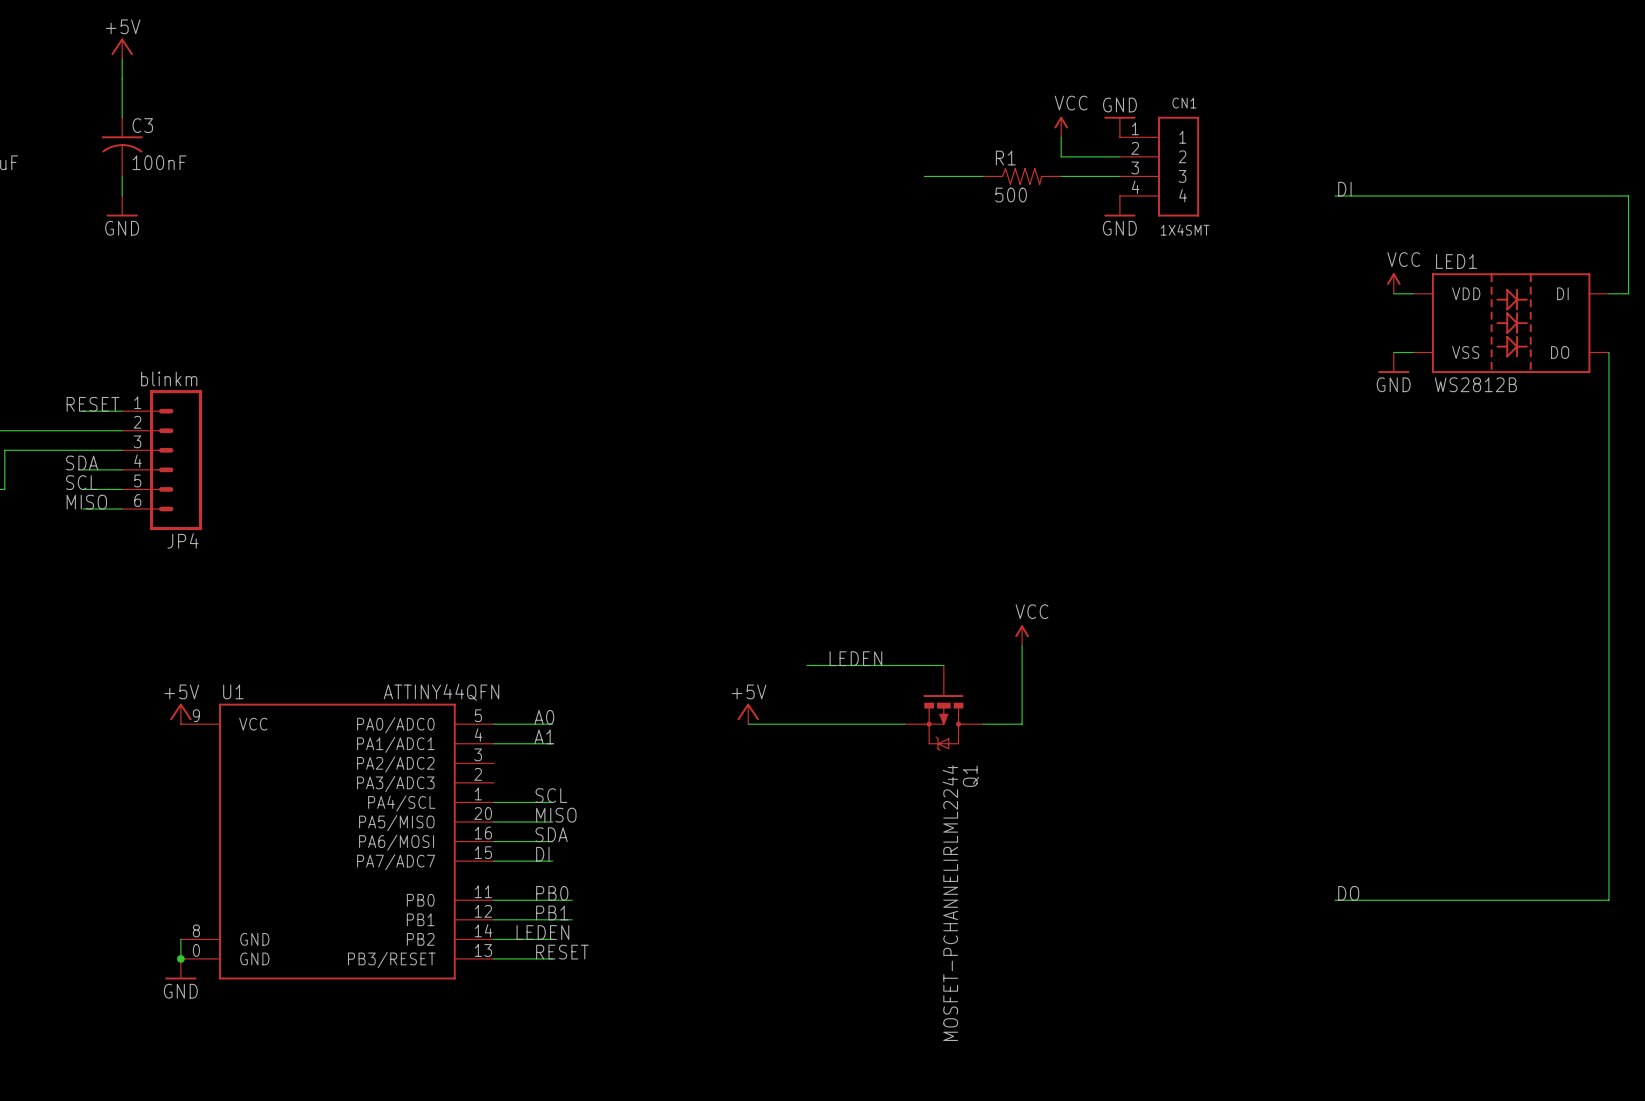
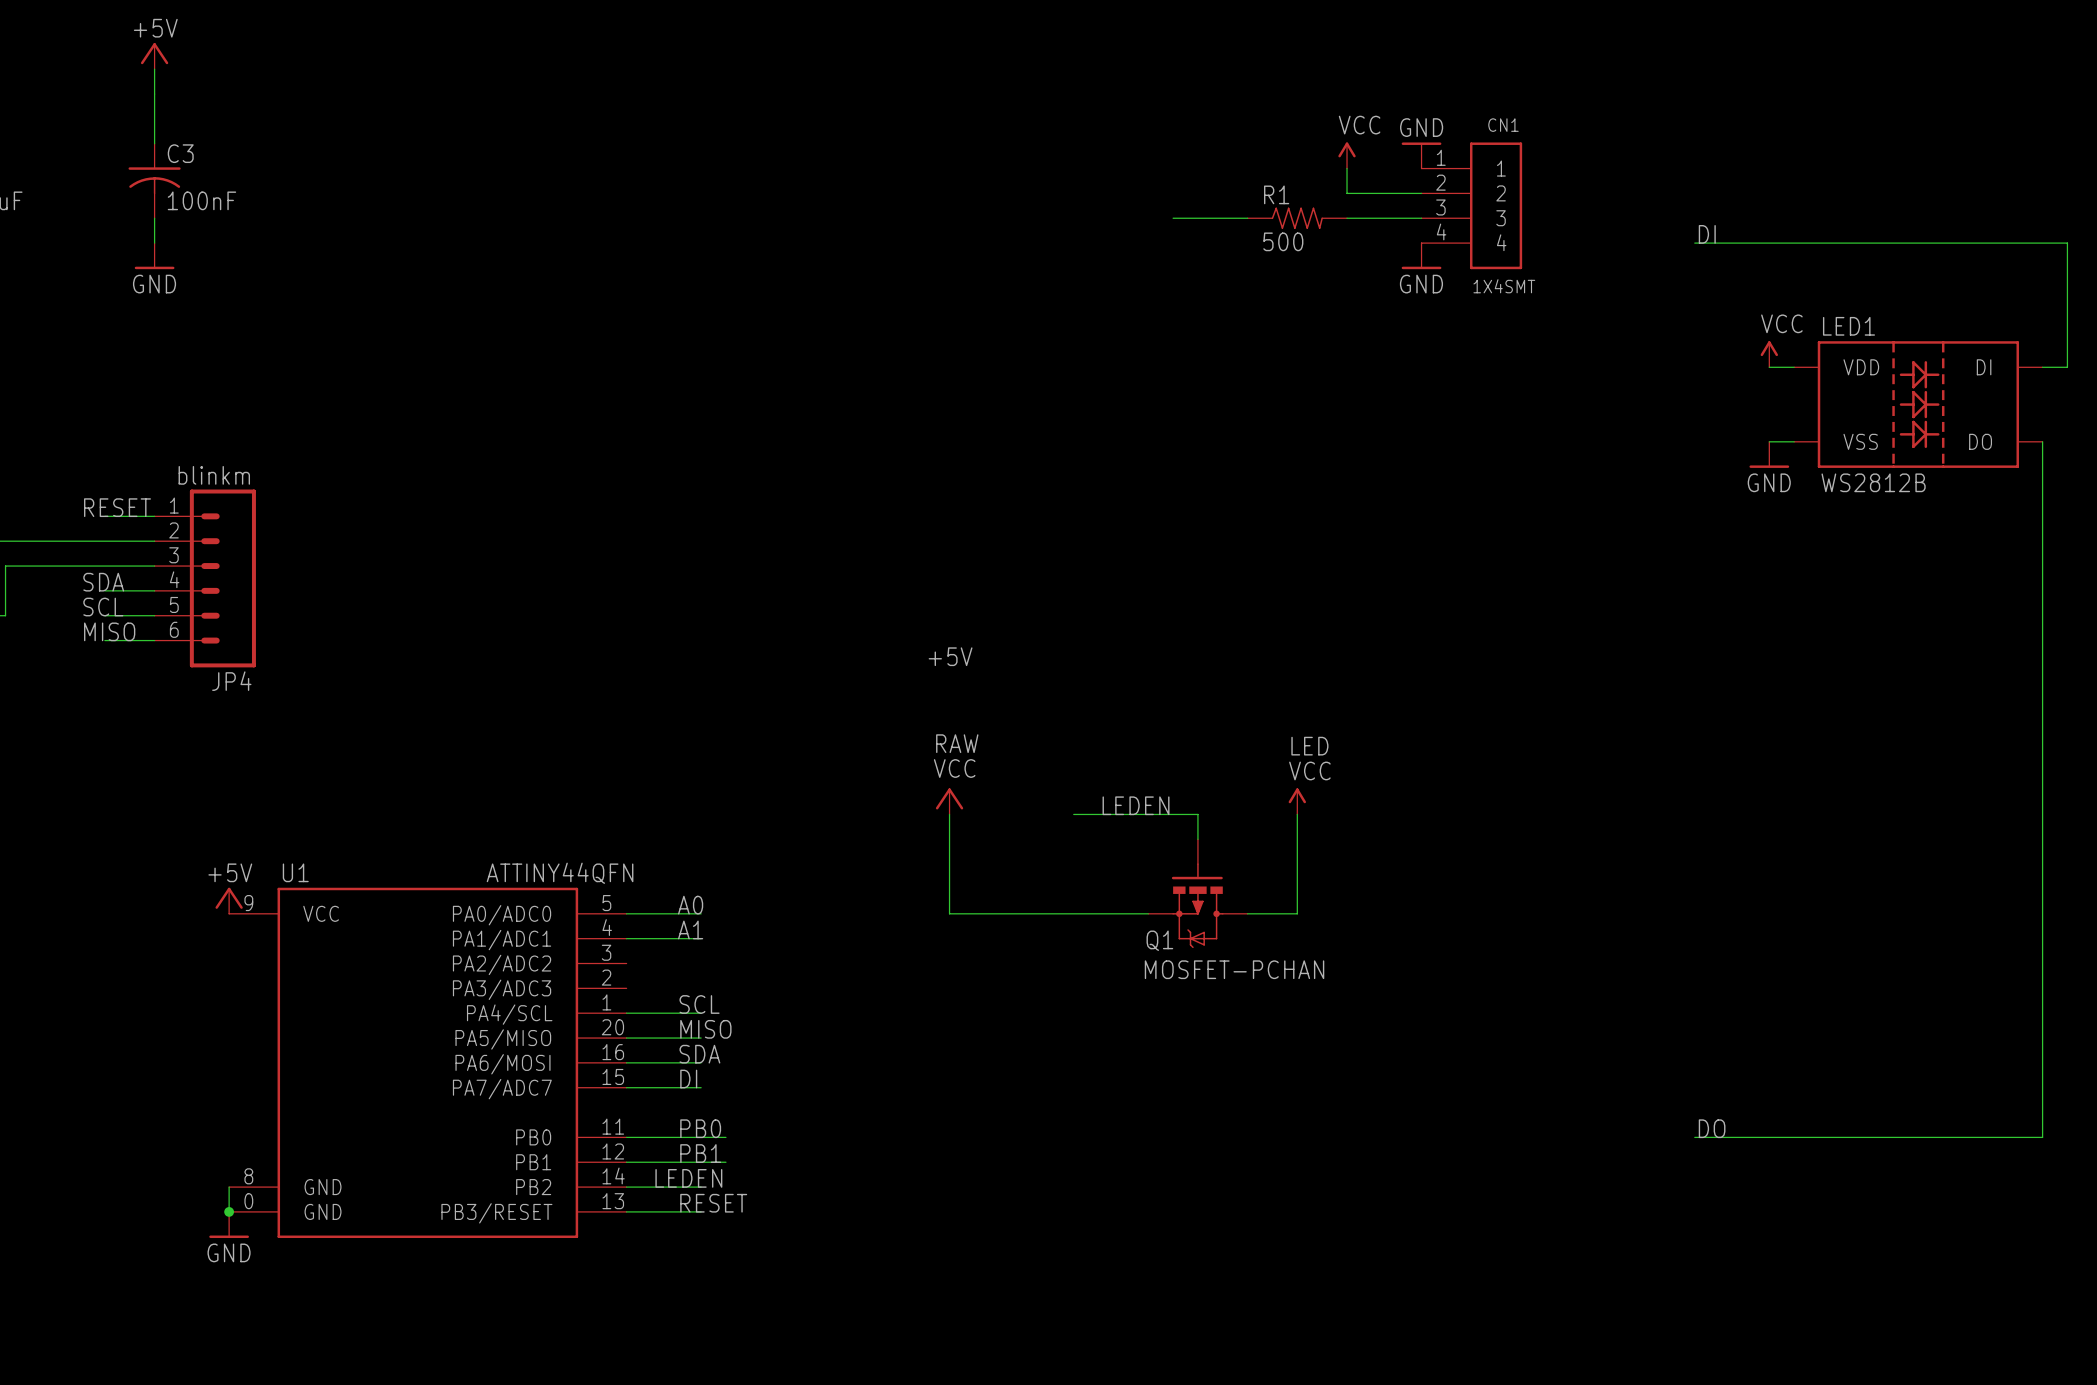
text: none -> RAW (957, 743)
text: none -> LED (1309, 746)
text: none -> VCC (954, 768)
wire: none -> (949, 814) (949, 913)
label position: LEDEN (855, 658) -> LEDEN (1136, 805)
wire: (806, 665) (943, 665) -> (1073, 814) (1197, 814) (1197, 839)
power symbol text position: +5V (749, 691) -> +5V (950, 656)
power symbol position: +5V (748, 713) -> +5V (949, 801)
Q1 name rotation: 0° (970, 776) -> 90° clockwise (1159, 940)
Q1 name position: Q1 (970, 776) -> Q1 (1159, 940)
Q1 value: MOSFET-PCHANNELIRLML2244 (950, 903) -> MOSFET-PCHAN (1234, 969)

